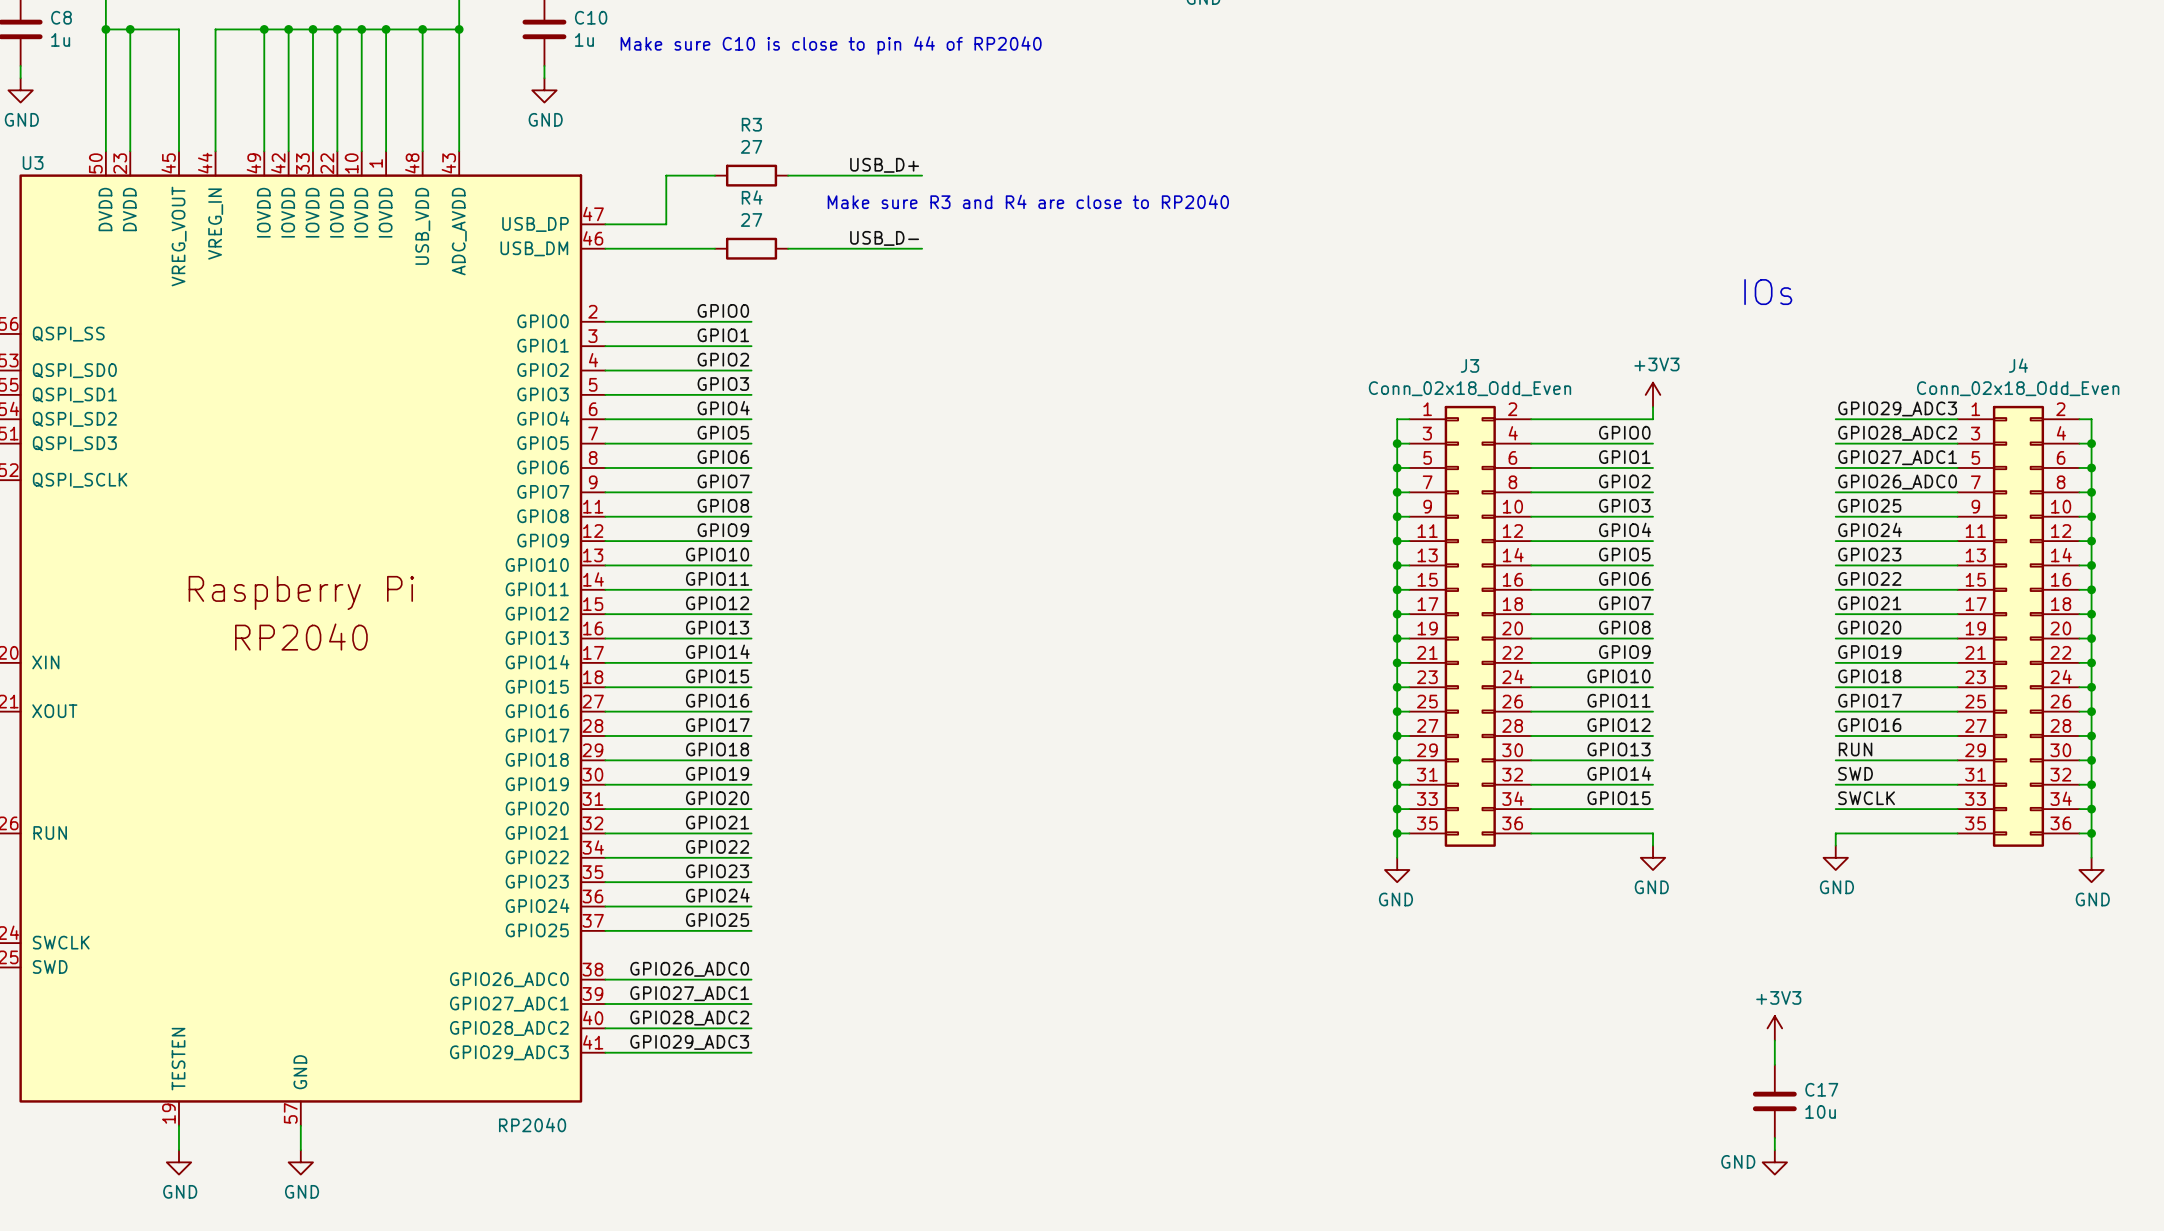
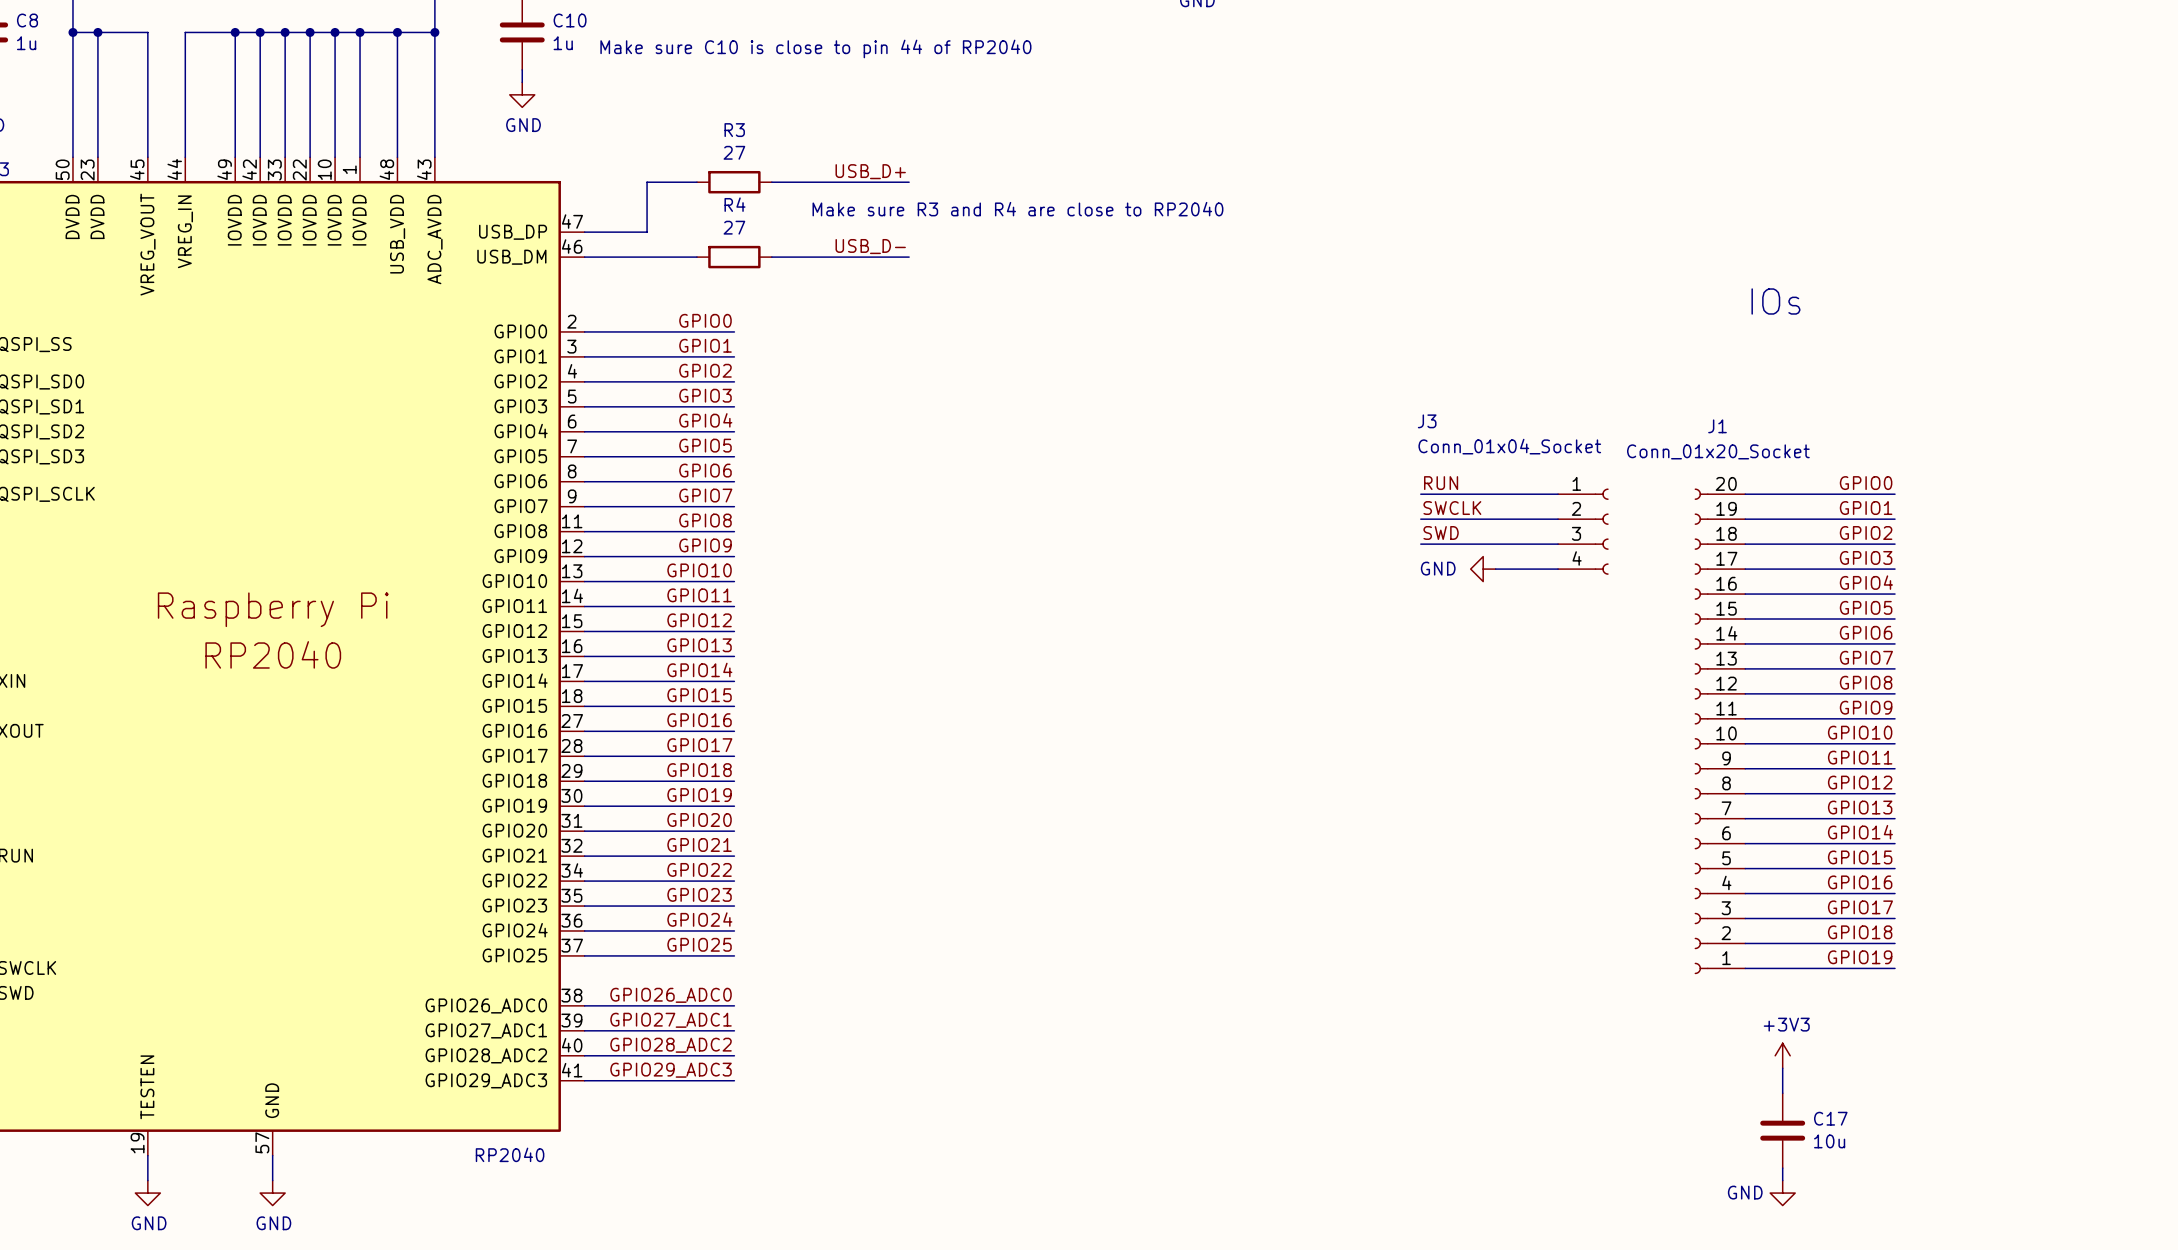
J3 name position: J3 (1469, 365) -> J3 (1427, 421)
J3 value: Conn_02x18_Odd_Even (1469, 388) -> Conn_01x04_Socket (1509, 446)
power symbol: +3V3 (1653, 394) -> none
J3 symbol: [1409, 405, 1532, 847] -> [1558, 488, 1609, 575]
wire: (1653, 407) (1653, 419) (1531, 419) -> none
label: GPIO29_ADC3 (1897, 408) -> none
wire: (1409, 419) (1397, 419) (1397, 857) -> none
wire: (1835, 419) (1957, 419) -> none
wire: (2079, 419) (2091, 419) (2091, 857) -> none
label position: GPIO0 (1624, 432) -> GPIO0 (1866, 483)
label: GPIO28_ADC2 (1897, 433) -> none
wire: (1397, 443) (1409, 443) -> none
junction: (1397, 443) -> none
wire: (1531, 443) (1653, 443) -> none
wire: (1835, 443) (1957, 443) -> none
wire: (2079, 443) (2091, 443) -> none
junction: (2091, 443) -> none
label position: GPIO1 (1624, 457) -> GPIO1 (1866, 508)
label: GPIO27_ADC1 (1897, 457) -> none
wire: (1397, 467) (1409, 467) -> none
junction: (1397, 467) -> none
wire: (1531, 467) (1653, 467) -> none
wire: (1835, 467) (1957, 467) -> none
wire: (2079, 467) (2091, 467) -> none
junction: (2091, 467) -> none
label: none -> RUN (1441, 483)
wire: none -> (1420, 494) (1558, 494)
wire: none -> (1745, 494) (1895, 494)
label position: GPIO2 (1624, 481) -> GPIO2 (1866, 532)
label: GPIO26_ADC0 (1897, 482) -> none
wire: (1397, 492) (1409, 492) -> none
junction: (1397, 492) -> none
wire: (1531, 492) (1653, 492) -> none
wire: (1835, 492) (1957, 492) -> none
wire: (2079, 492) (2091, 492) -> none
junction: (2091, 492) -> none
label: none -> SWCLK (1452, 508)
wire: none -> (1420, 519) (1558, 519)
wire: none -> (1745, 519) (1895, 519)
label position: GPIO3 (1624, 505) -> GPIO3 (1866, 557)
label: GPIO25 (1869, 505) -> none
wire: (1397, 516) (1409, 516) -> none
junction: (1397, 516) -> none
wire: (1531, 516) (1653, 516) -> none
wire: (1835, 516) (1957, 516) -> none
wire: (2079, 516) (2091, 516) -> none
junction: (2091, 516) -> none
label: none -> SWD (1441, 532)
wire: none -> (1420, 544) (1558, 544)
wire: none -> (1745, 544) (1895, 544)
label position: GPIO4 (1625, 529) -> GPIO4 (1866, 582)
label: GPIO24 (1870, 529) -> none
wire: (1397, 541) (1409, 541) -> none
junction: (1397, 541) -> none
wire: (1531, 541) (1653, 541) -> none
wire: (1835, 541) (1957, 541) -> none
wire: (2079, 541) (2091, 541) -> none
junction: (2091, 541) -> none
power symbol: none -> GND (1483, 569)
wire: none -> (1495, 569) (1558, 569)
wire: none -> (1745, 569) (1895, 569)
label position: GPIO5 (1624, 554) -> GPIO5 (1866, 607)
label: GPIO23 (1869, 554) -> none
wire: (1397, 565) (1409, 565) -> none
junction: (1397, 565) -> none
wire: (1531, 565) (1653, 565) -> none
wire: (1835, 565) (1957, 565) -> none
wire: (2079, 565) (2091, 565) -> none
junction: (2091, 565) -> none
wire: none -> (1745, 594) (1895, 594)
label position: GPIO6 (1624, 578) -> GPIO6 (1866, 632)
label: GPIO22 (1869, 578) -> none
wire: (1397, 589) (1409, 589) -> none
junction: (1397, 589) -> none
wire: (1531, 589) (1653, 589) -> none
wire: (1835, 589) (1957, 589) -> none
wire: (2079, 589) (2091, 589) -> none
junction: (2091, 589) -> none
wire: none -> (1745, 619) (1895, 619)
label position: GPIO7 (1625, 603) -> GPIO7 (1866, 657)
label: GPIO21 (1869, 603) -> none
wire: (1397, 614) (1409, 614) -> none
junction: (1397, 614) -> none
wire: (1531, 614) (1653, 614) -> none
wire: (1835, 614) (1957, 614) -> none
wire: (2079, 614) (2091, 614) -> none
junction: (2091, 614) -> none
wire: none -> (1745, 643) (1895, 643)
J4: Conn_02x18_Odd_Even (2018, 626) -> none
label position: GPIO8 (1624, 627) -> GPIO8 (1866, 682)
label: GPIO20 (1869, 627) -> none
wire: (1397, 638) (1409, 638) -> none
junction: (1397, 638) -> none
wire: (1531, 638) (1653, 638) -> none
wire: (1835, 638) (1957, 638) -> none
wire: (2079, 638) (2091, 638) -> none
junction: (2091, 638) -> none
wire: none -> (1745, 668) (1895, 668)
label position: GPIO9 (1624, 652) -> GPIO9 (1866, 707)
label: GPIO19 (1869, 652) -> none
wire: (1397, 662) (1409, 662) -> none
junction: (1397, 662) -> none
wire: (1531, 662) (1653, 662) -> none
wire: (1835, 662) (1957, 662) -> none
wire: (2079, 662) (2091, 662) -> none
junction: (2091, 662) -> none
wire: none -> (1745, 693) (1895, 693)
label position: GPIO10 (1618, 676) -> GPIO10 (1860, 732)
label position: GPIO18 (1869, 676) -> GPIO18 (1860, 932)
wire: (1397, 687) (1409, 687) -> none
junction: (1397, 687) -> none
wire: (1531, 687) (1653, 687) -> none
wire: (1835, 687) (1957, 687) -> none
wire: (2079, 687) (2091, 687) -> none
junction: (2091, 687) -> none
wire: none -> (1745, 718) (1895, 718)
label position: GPIO11 (1618, 700) -> GPIO11 (1860, 757)
label position: GPIO17 (1870, 700) -> GPIO17 (1860, 907)
wire: (1397, 711) (1409, 711) -> none
junction: (1397, 711) -> none
wire: (1531, 711) (1653, 711) -> none
J1: none -> Conn_01x20_Socket (1719, 731)
wire: (1835, 711) (1957, 711) -> none
wire: (2079, 711) (2091, 711) -> none
junction: (2091, 711) -> none
wire: none -> (1745, 743) (1895, 743)
label position: GPIO12 (1618, 725) -> GPIO12 (1860, 782)
label position: GPIO16 (1869, 725) -> GPIO16 (1860, 882)
wire: (1397, 735) (1409, 735) -> none
junction: (1397, 735) -> none
wire: (1531, 735) (1653, 735) -> none
wire: (1835, 735) (1957, 735) -> none
wire: (2079, 735) (2091, 735) -> none
junction: (2091, 735) -> none
wire: none -> (1745, 768) (1895, 768)
label position: GPIO13 (1618, 749) -> GPIO13 (1860, 807)
label: RUN (1855, 749) -> none
wire: (1397, 760) (1409, 760) -> none
junction: (1397, 760) -> none
wire: (1531, 760) (1653, 760) -> none
wire: (1835, 760) (1957, 760) -> none
wire: (2079, 760) (2091, 760) -> none
junction: (2091, 760) -> none
wire: none -> (1745, 793) (1895, 793)
label position: GPIO14 (1619, 773) -> GPIO14 (1860, 832)
label: SWD (1855, 773) -> none
wire: (1397, 784) (1409, 784) -> none
junction: (1397, 784) -> none
wire: (1531, 784) (1653, 784) -> none
wire: (1835, 784) (1957, 784) -> none
wire: (2079, 784) (2091, 784) -> none
junction: (2091, 784) -> none
wire: none -> (1745, 818) (1895, 818)
label position: GPIO15 (1618, 798) -> GPIO15 (1860, 857)
label: SWCLK (1866, 798) -> none
wire: (1397, 809) (1409, 809) -> none
junction: (1397, 809) -> none
wire: (1531, 809) (1653, 809) -> none
wire: (1835, 809) (1957, 809) -> none
wire: (2079, 809) (2091, 809) -> none
junction: (2091, 809) -> none
wire: none -> (1745, 843) (1895, 843)
wire: (1397, 833) (1409, 833) -> none
junction: (1397, 833) -> none
wire: (1531, 833) (1653, 833) (1653, 845) -> none
wire: (1957, 833) (1835, 833) (1835, 845) -> none
wire: (2079, 833) (2091, 833) -> none
junction: (2091, 833) -> none
wire: none -> (1745, 868) (1895, 868)
power symbol: GND (1653, 857) -> none
power symbol: GND (1835, 857) -> none
power symbol: GND (1397, 869) -> none
wire: none -> (1745, 893) (1895, 893)
power symbol: GND (2091, 869) -> none
wire: none -> (1745, 918) (1895, 918)
wire: none -> (1745, 943) (1895, 943)
label: none -> GPIO19 (1860, 957)
wire: none -> (1745, 968) (1895, 968)

